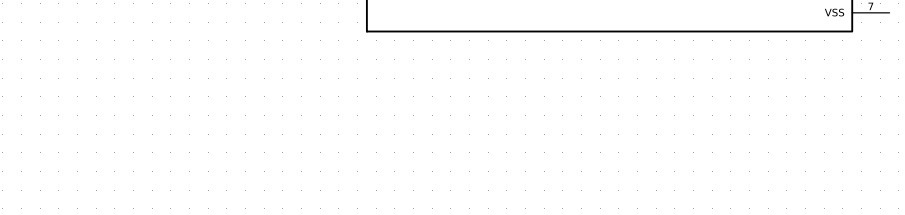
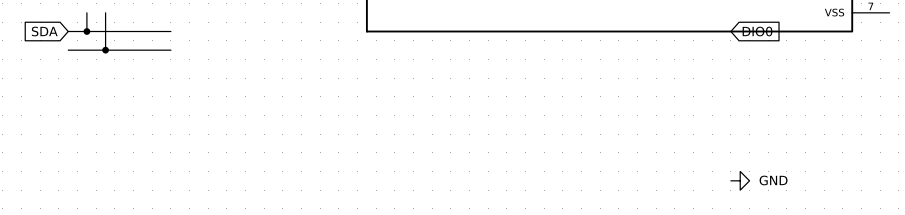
wire: none -> (86, 12) (86, 31)
wire: none -> (105, 12) (105, 50)
global label: none -> SDA (44, 31)
wire: none -> (68, 31) (170, 31)
junction: none -> (86, 31)
global label: none -> DIO0 (757, 31)
wire: none -> (68, 50) (170, 50)
junction: none -> (105, 50)
power symbol: none -> GND (740, 180)

